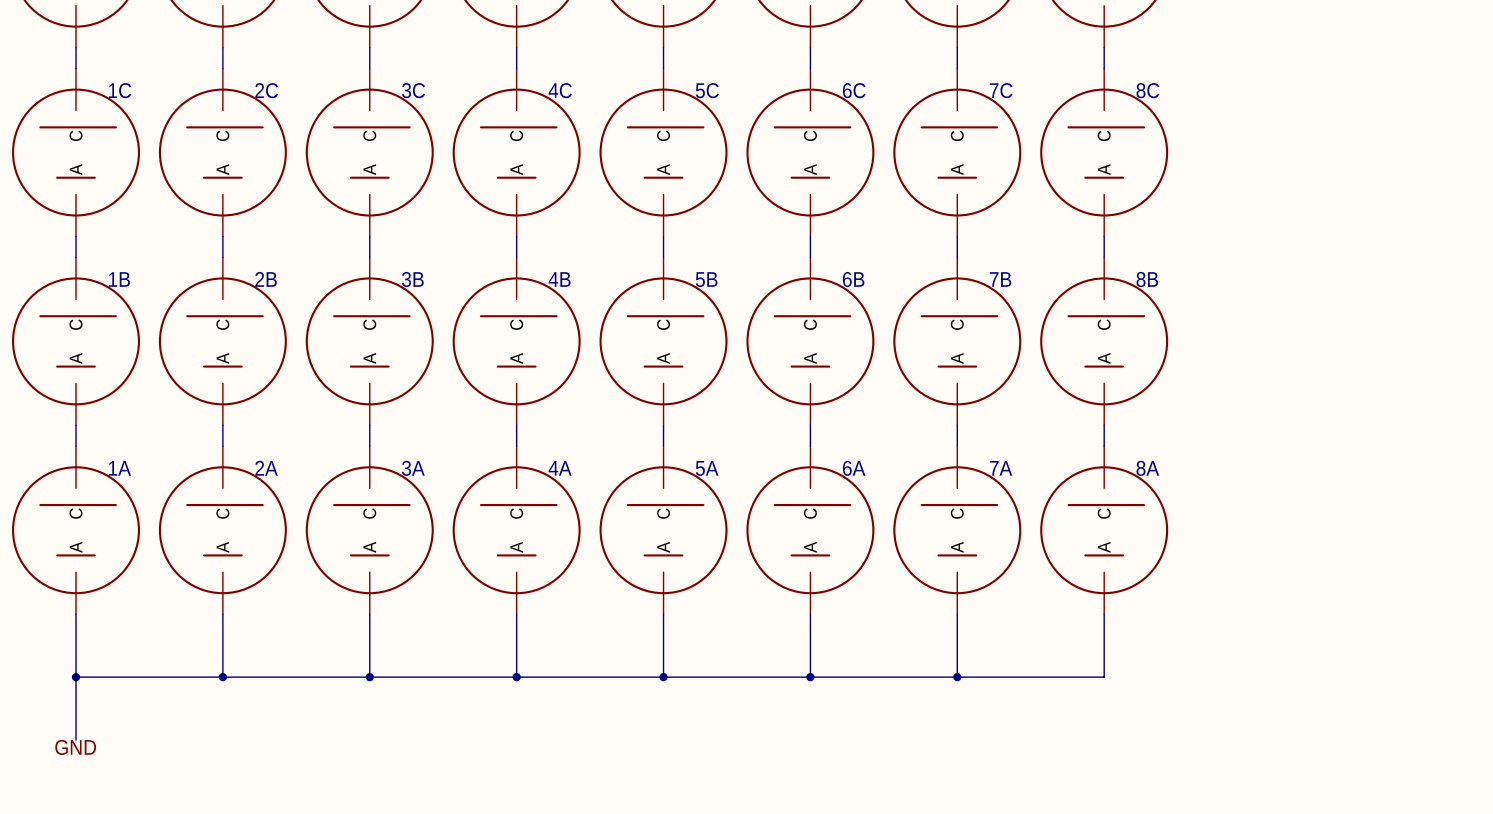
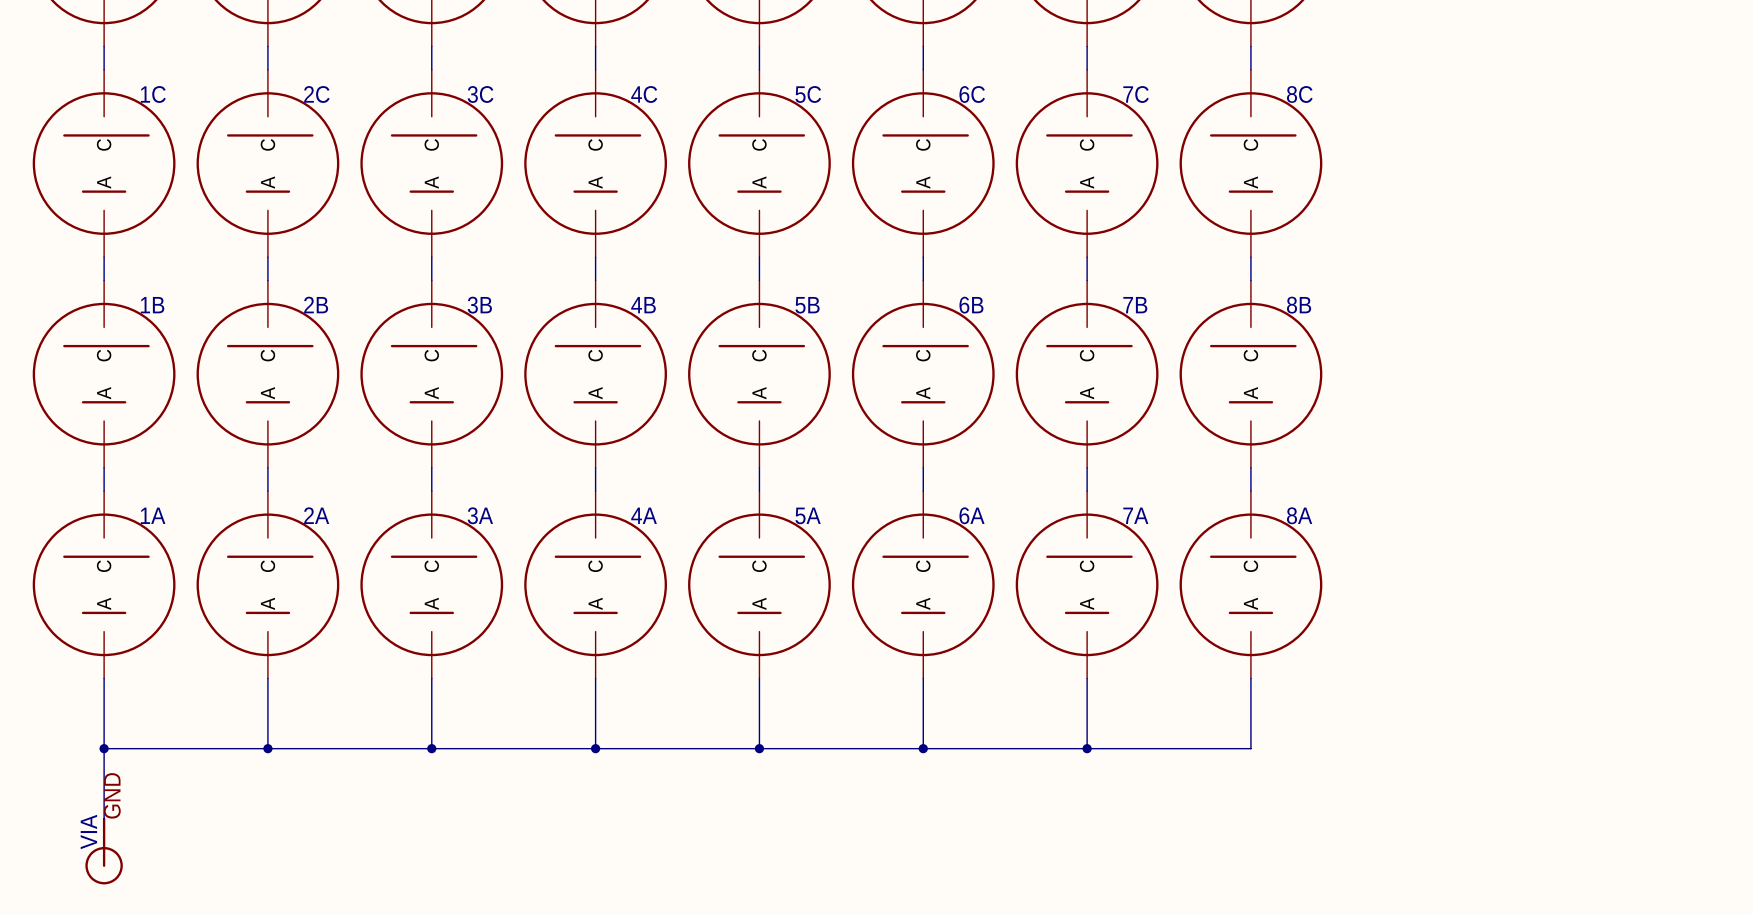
label rotation: 0° (75, 747) -> 90° counterclockwise (112, 795)
part: none -> (104, 851)

